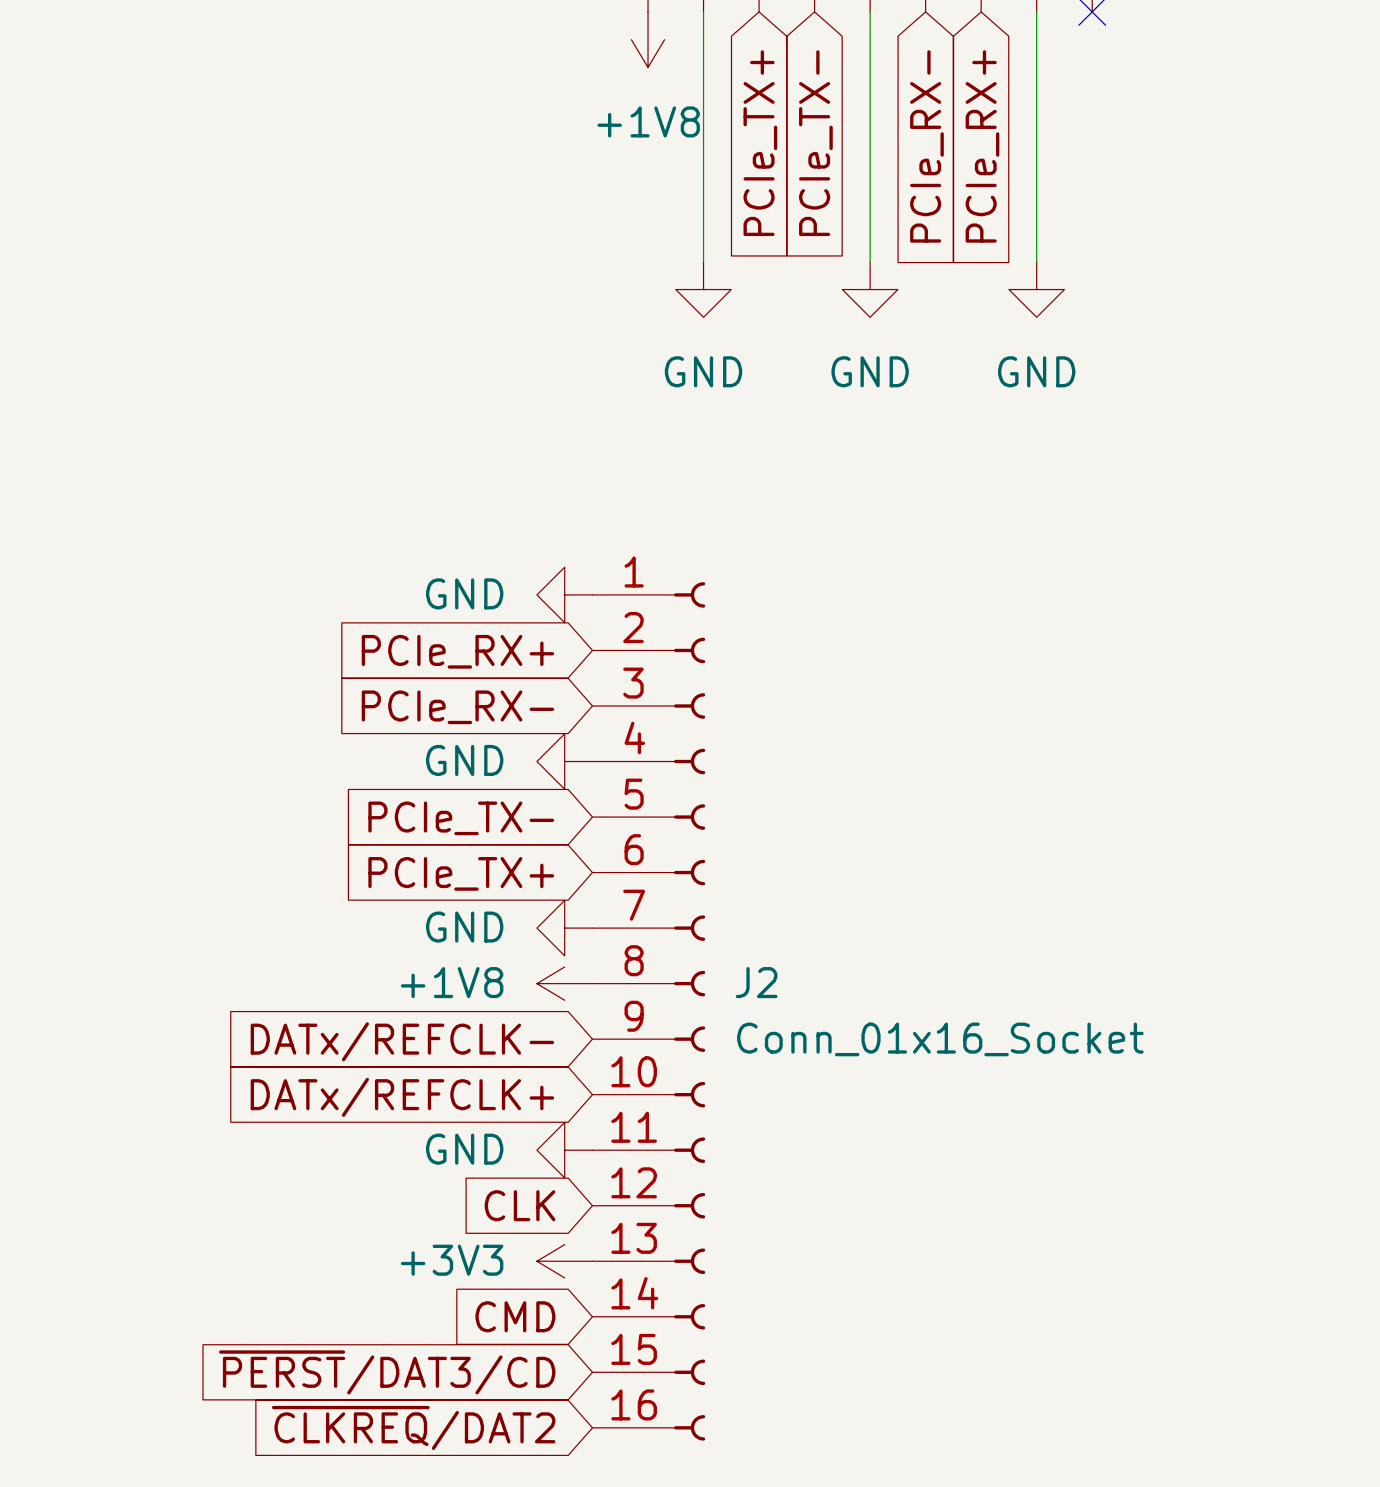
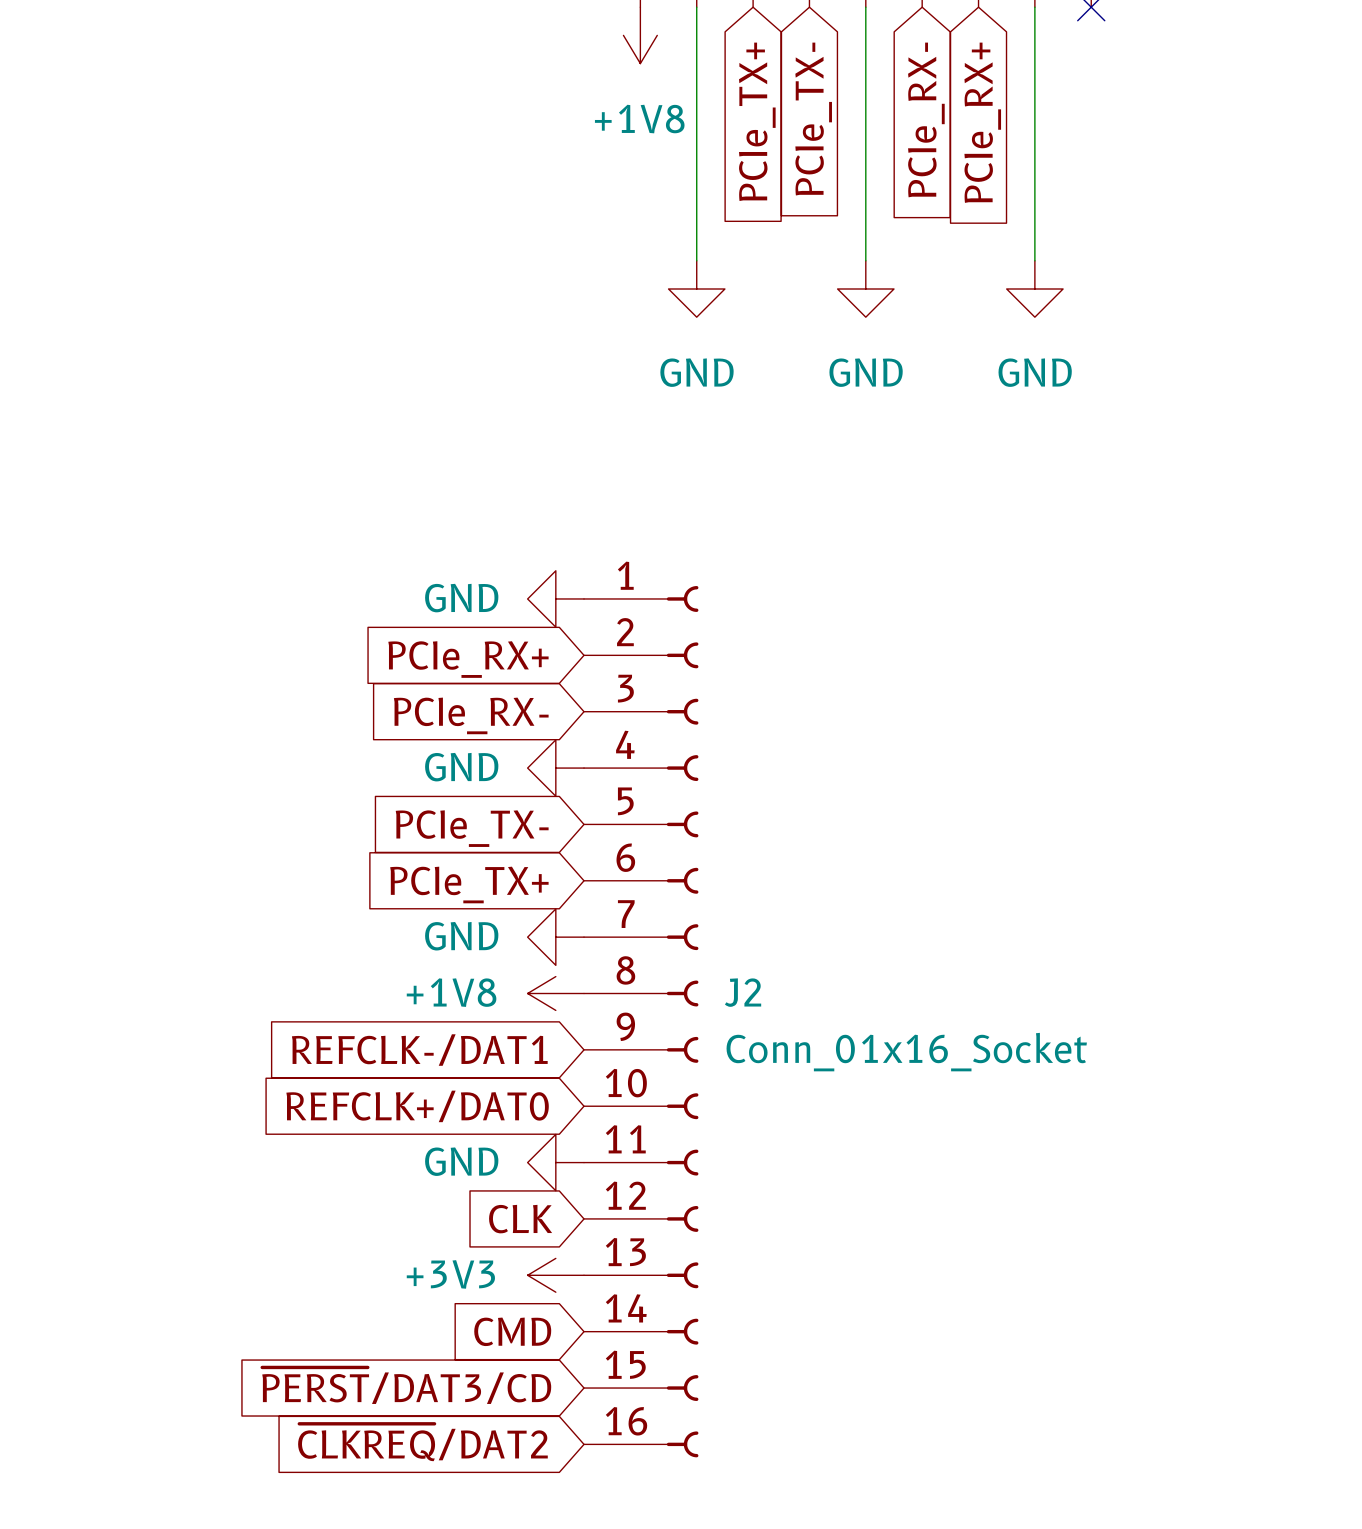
global label: DATx/REFCLK- (402, 1041) -> REFCLK-/DAT1 (419, 1050)
global label: DATx/REFCLK+ (402, 1097) -> REFCLK+/DAT0 (417, 1106)

